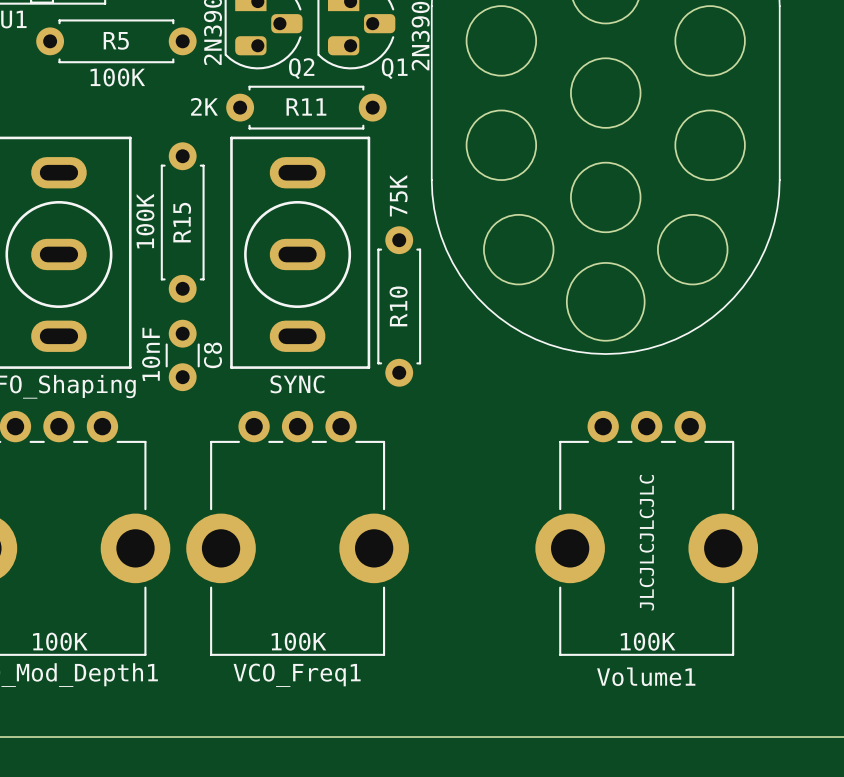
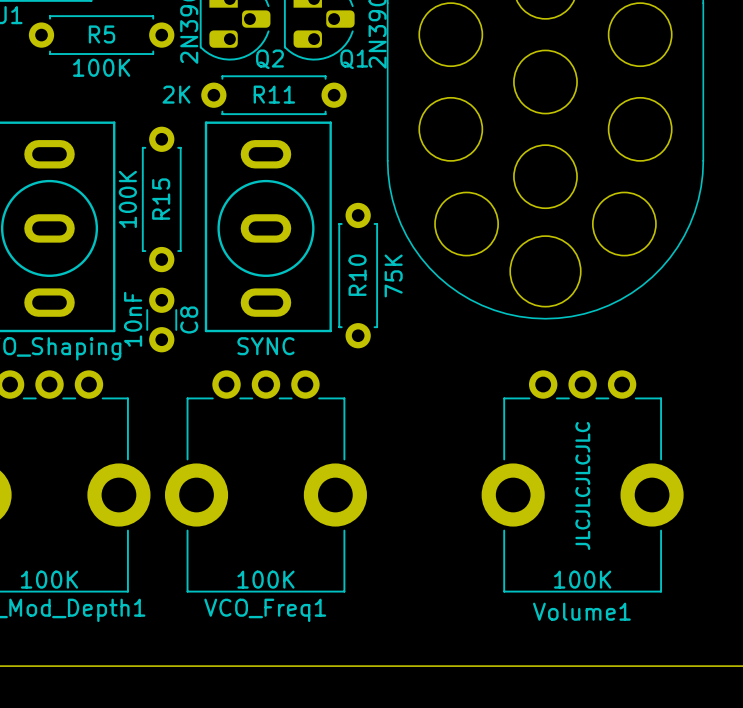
R10 value position: 75K (398, 195) -> 75K (393, 275)

